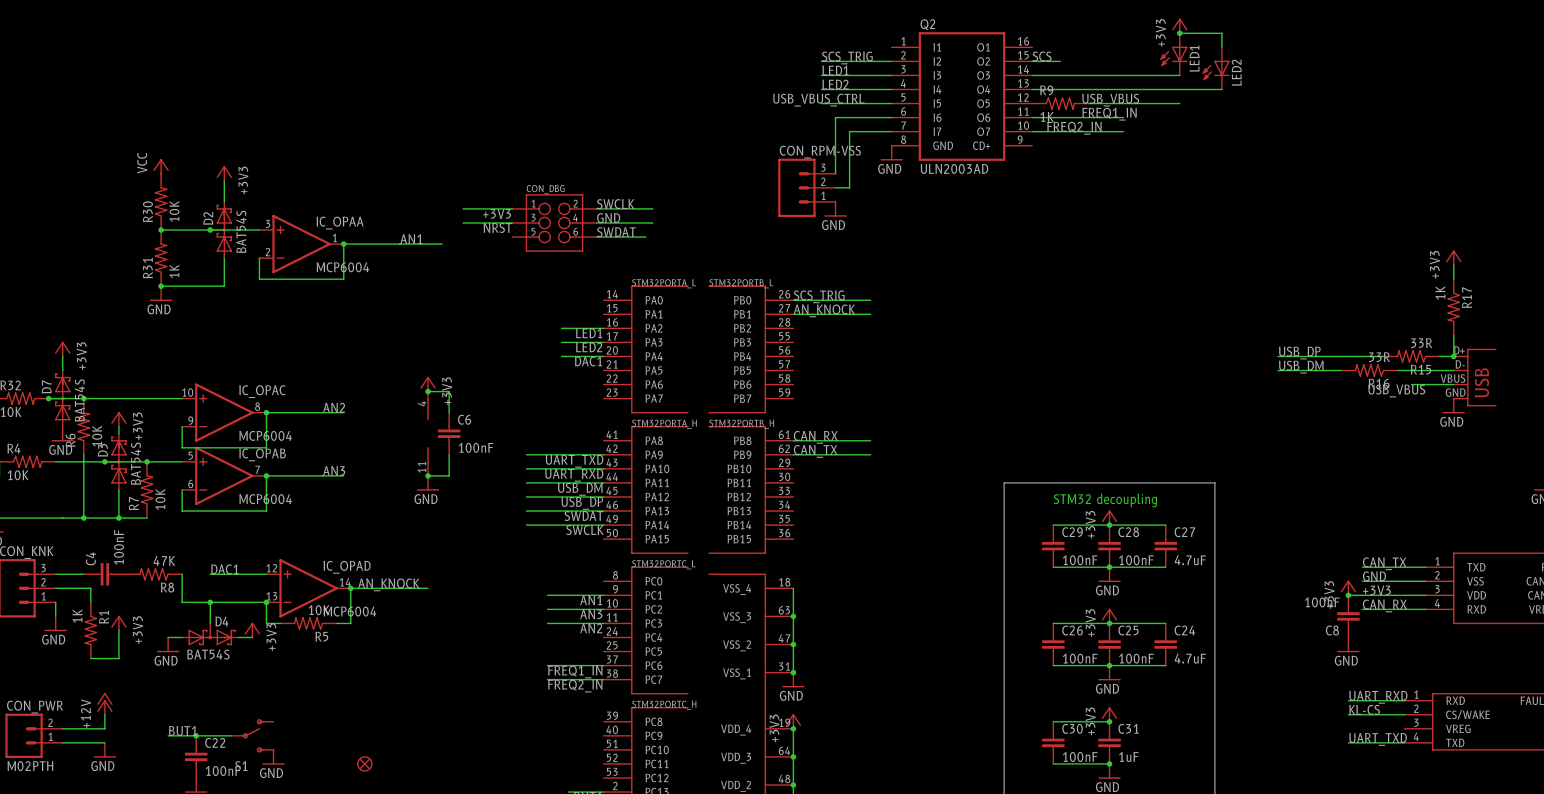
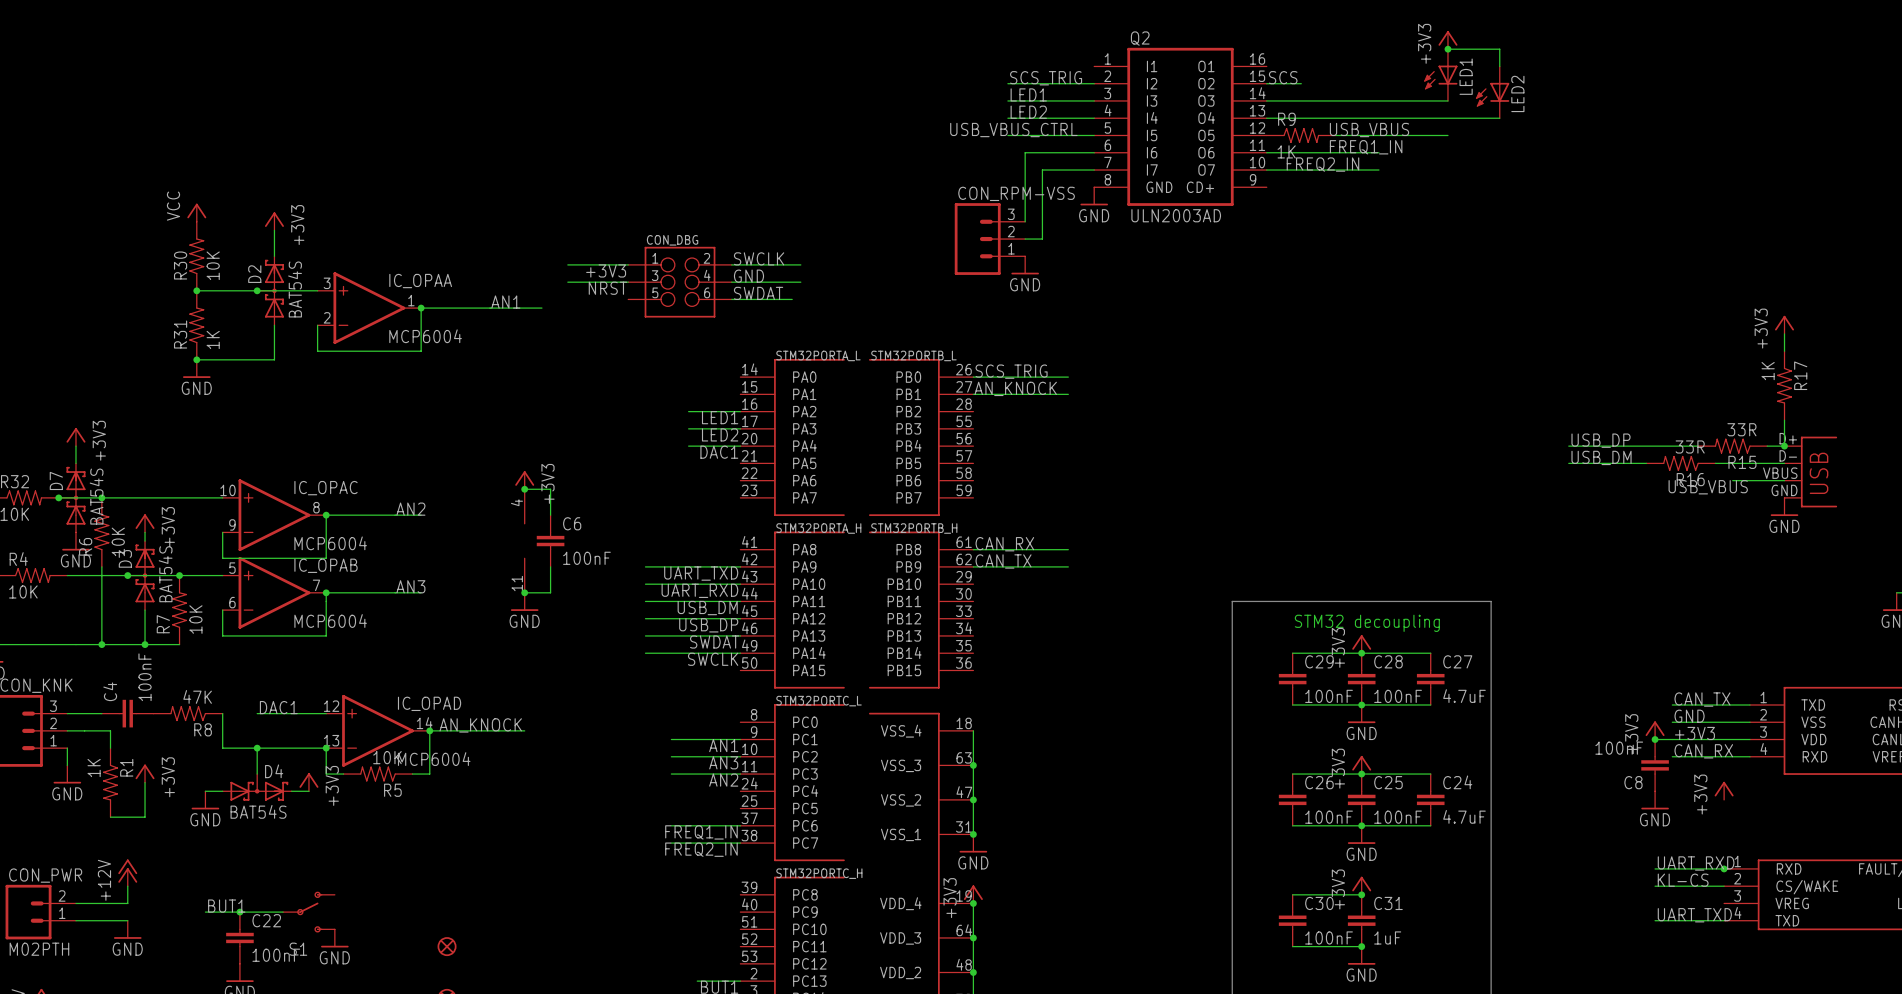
power symbol: none -> +3V3 (1724, 790)
junction: none -> (1724, 868)

